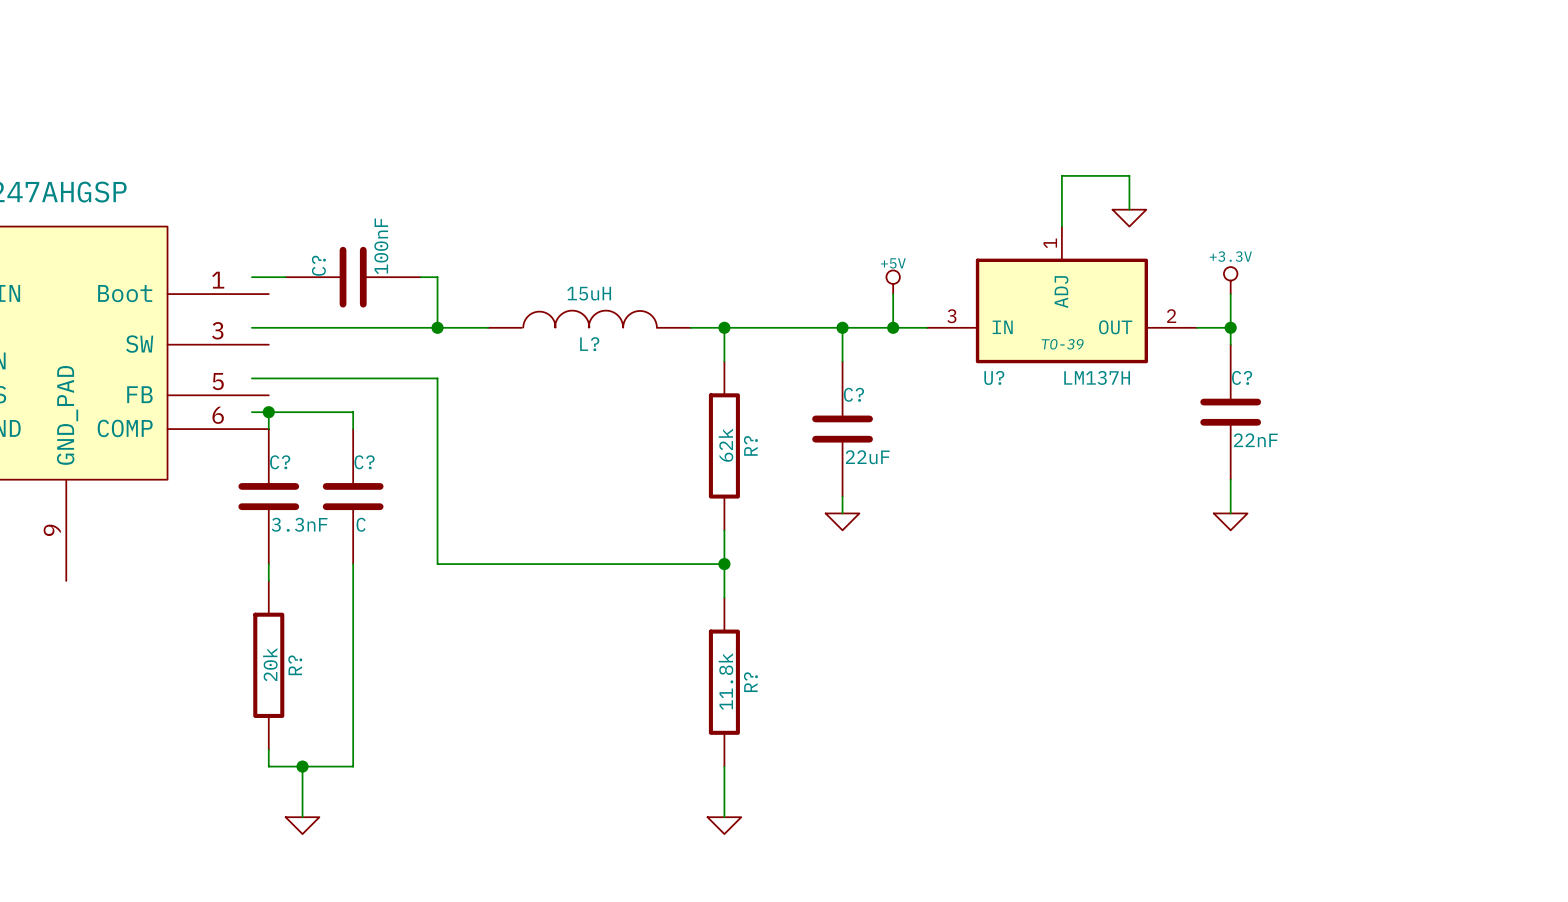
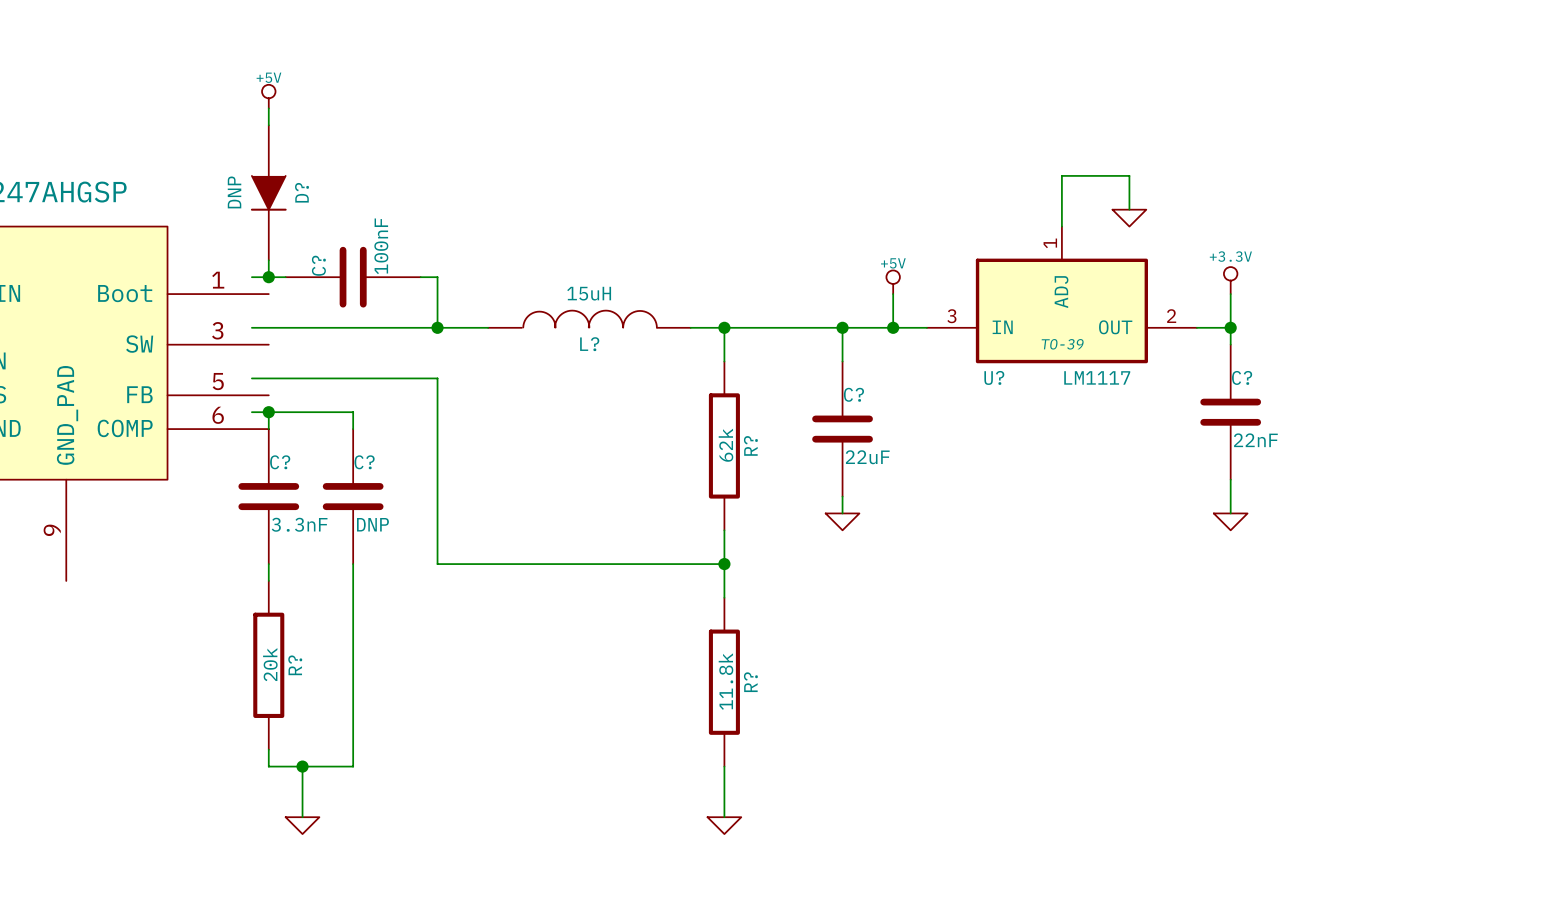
power symbol: none -> +5V (268, 96)
wire: none -> (268, 108) (268, 125)
D?: none -> DNP (268, 192)
wire: none -> (268, 260) (268, 277)
junction: none -> (268, 277)
U? value: LM137H (1097, 377) -> LM1117 (1097, 377)
C? value: C (361, 524) -> DNP (372, 524)

